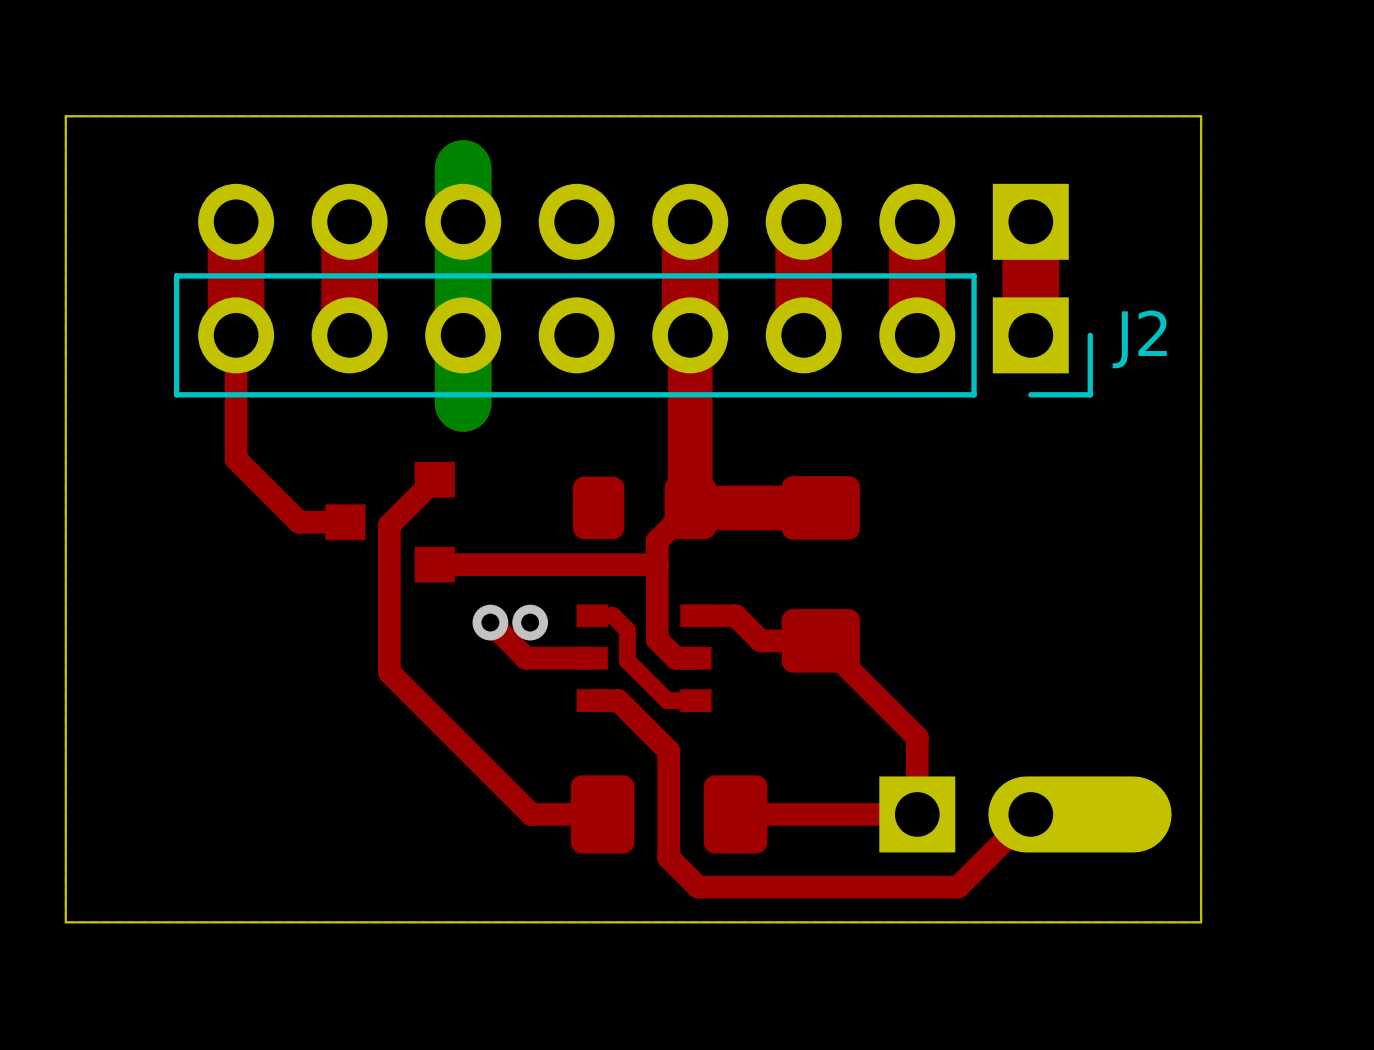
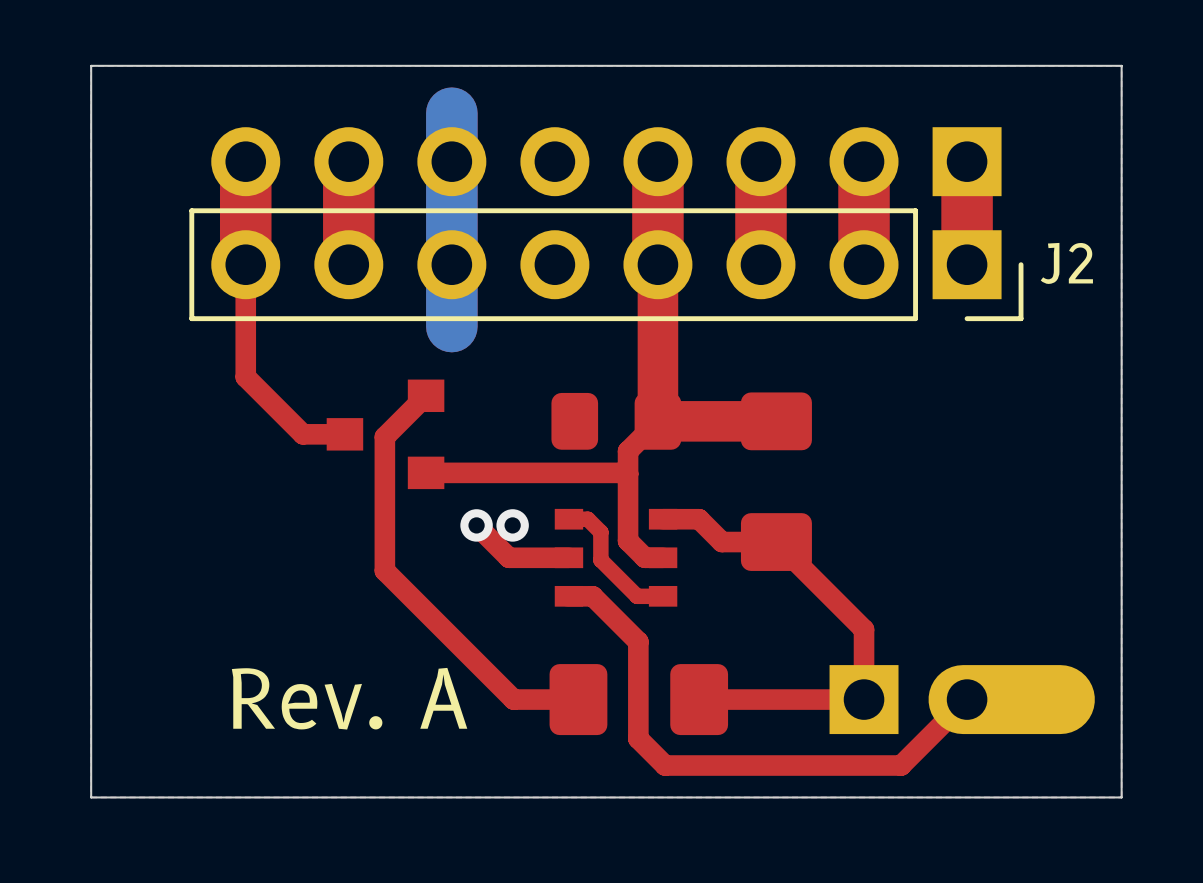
text: none -> Rev. A (349, 698)

